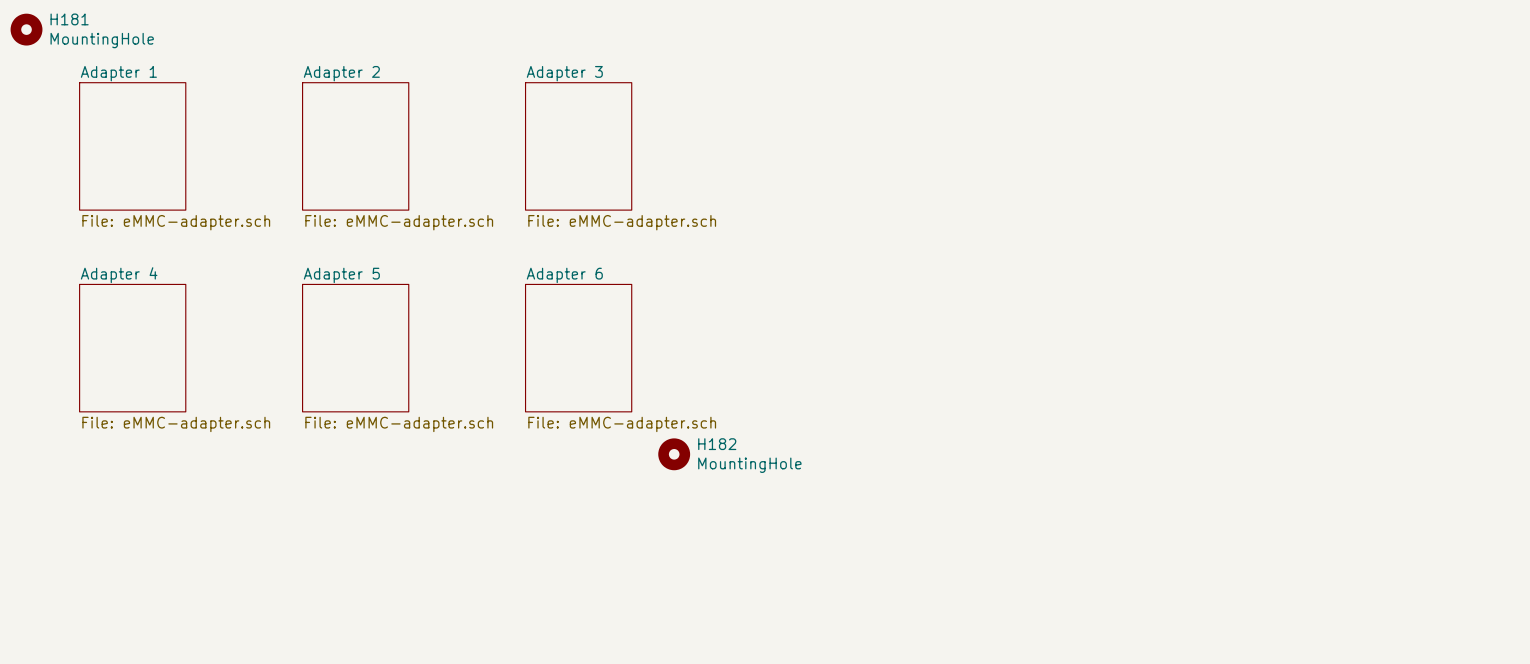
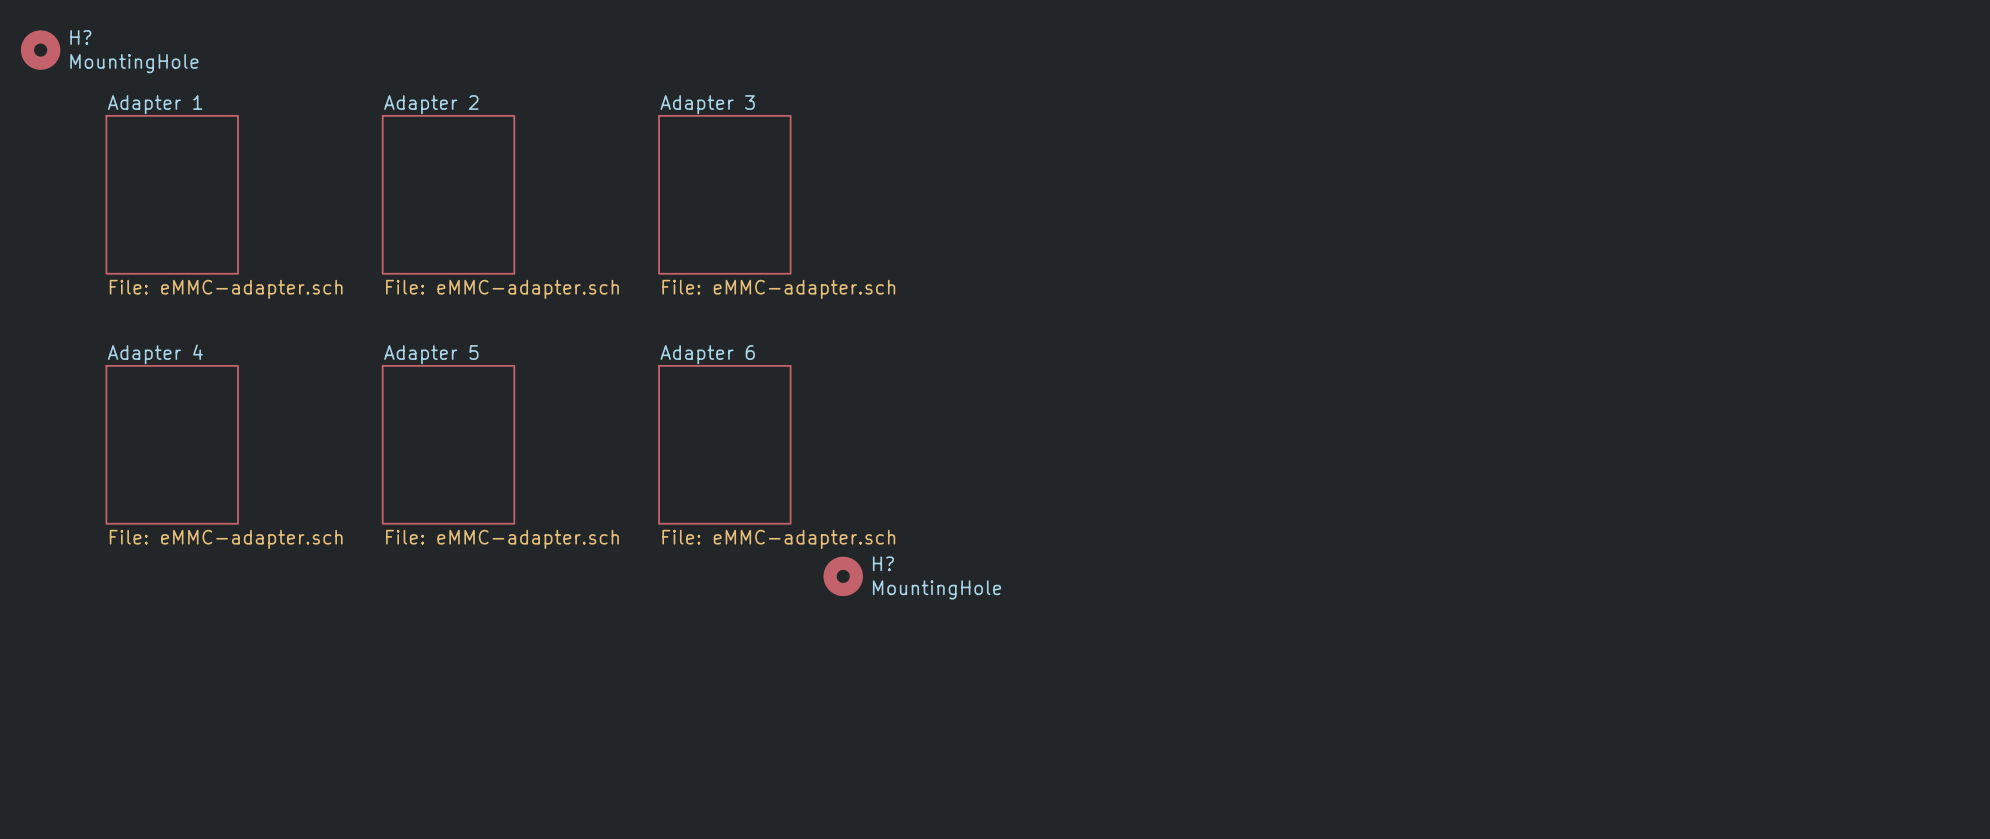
H181 name: H181 (69, 19) -> H? (80, 37)
H182 name: H182 (717, 444) -> H? (883, 563)

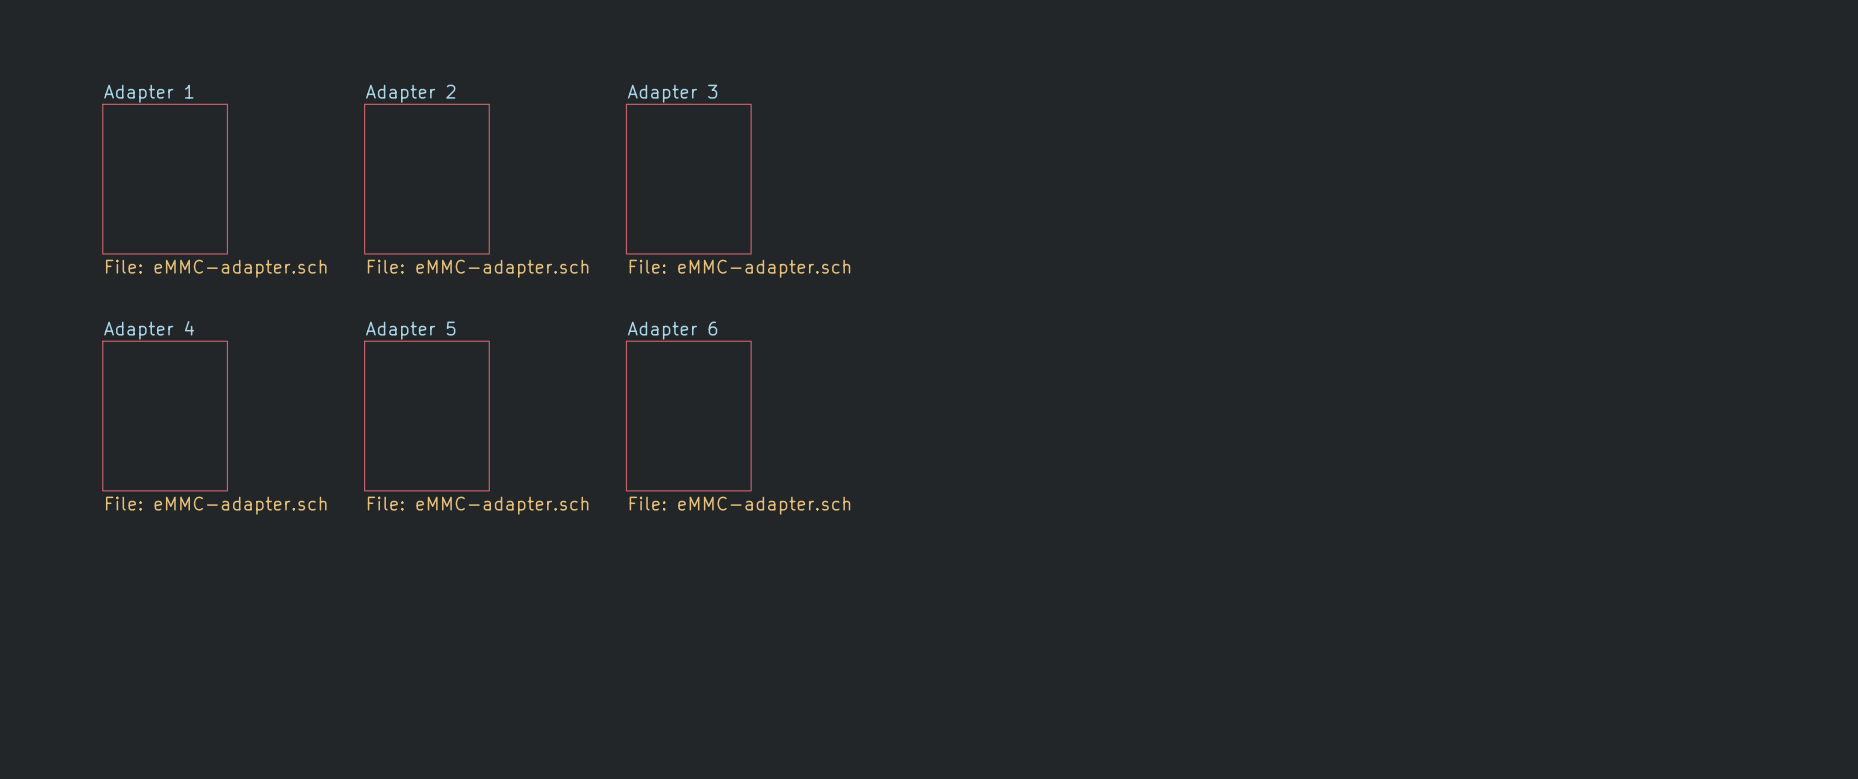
H?: MountingHole (40, 50) -> none
H?: MountingHole (843, 576) -> none

